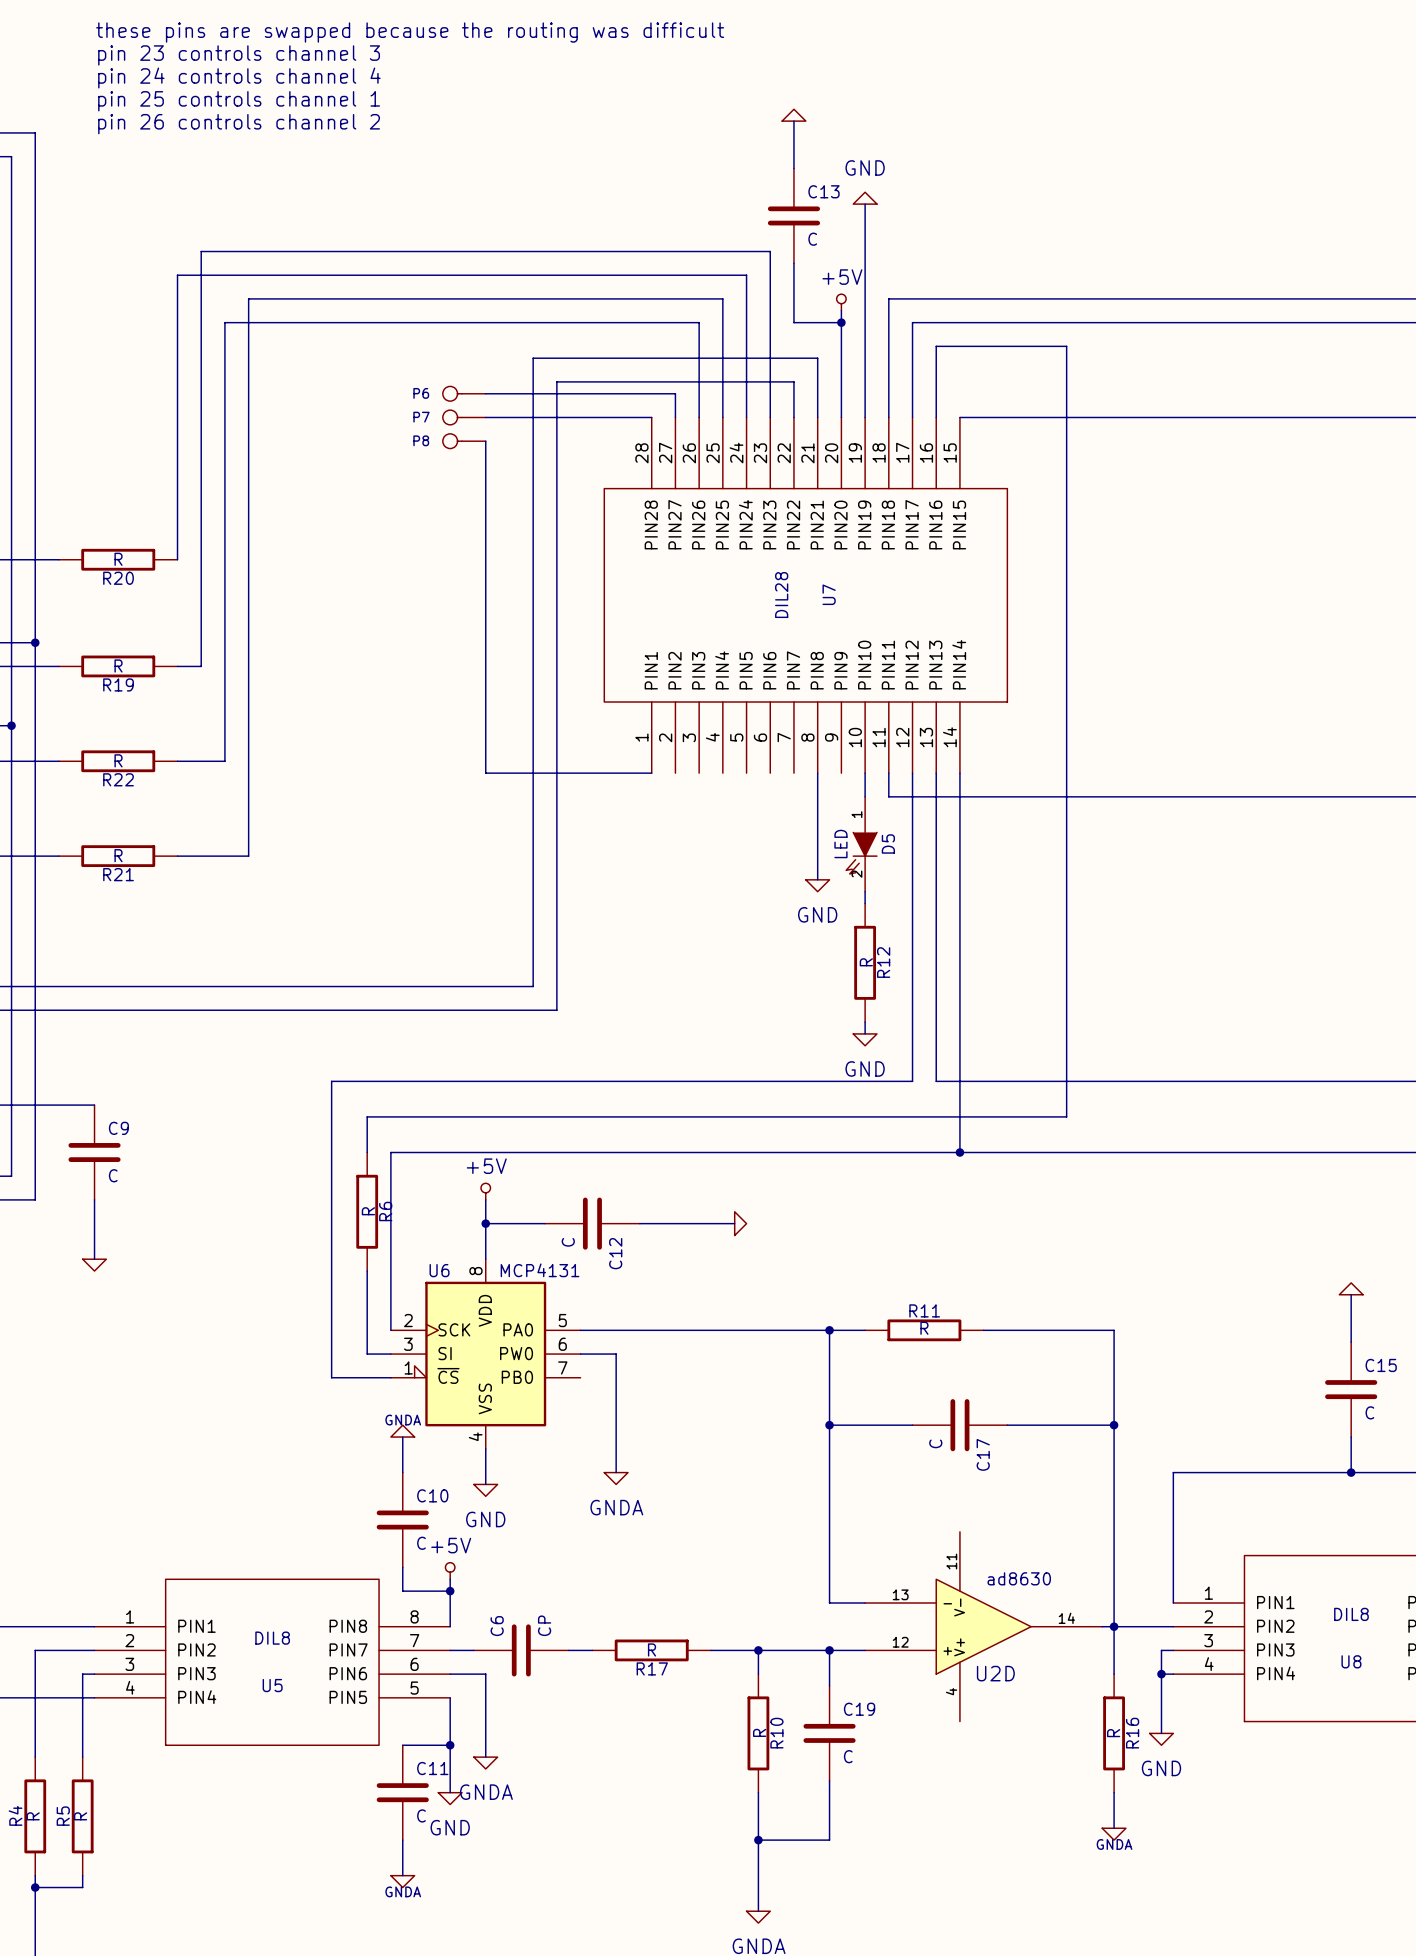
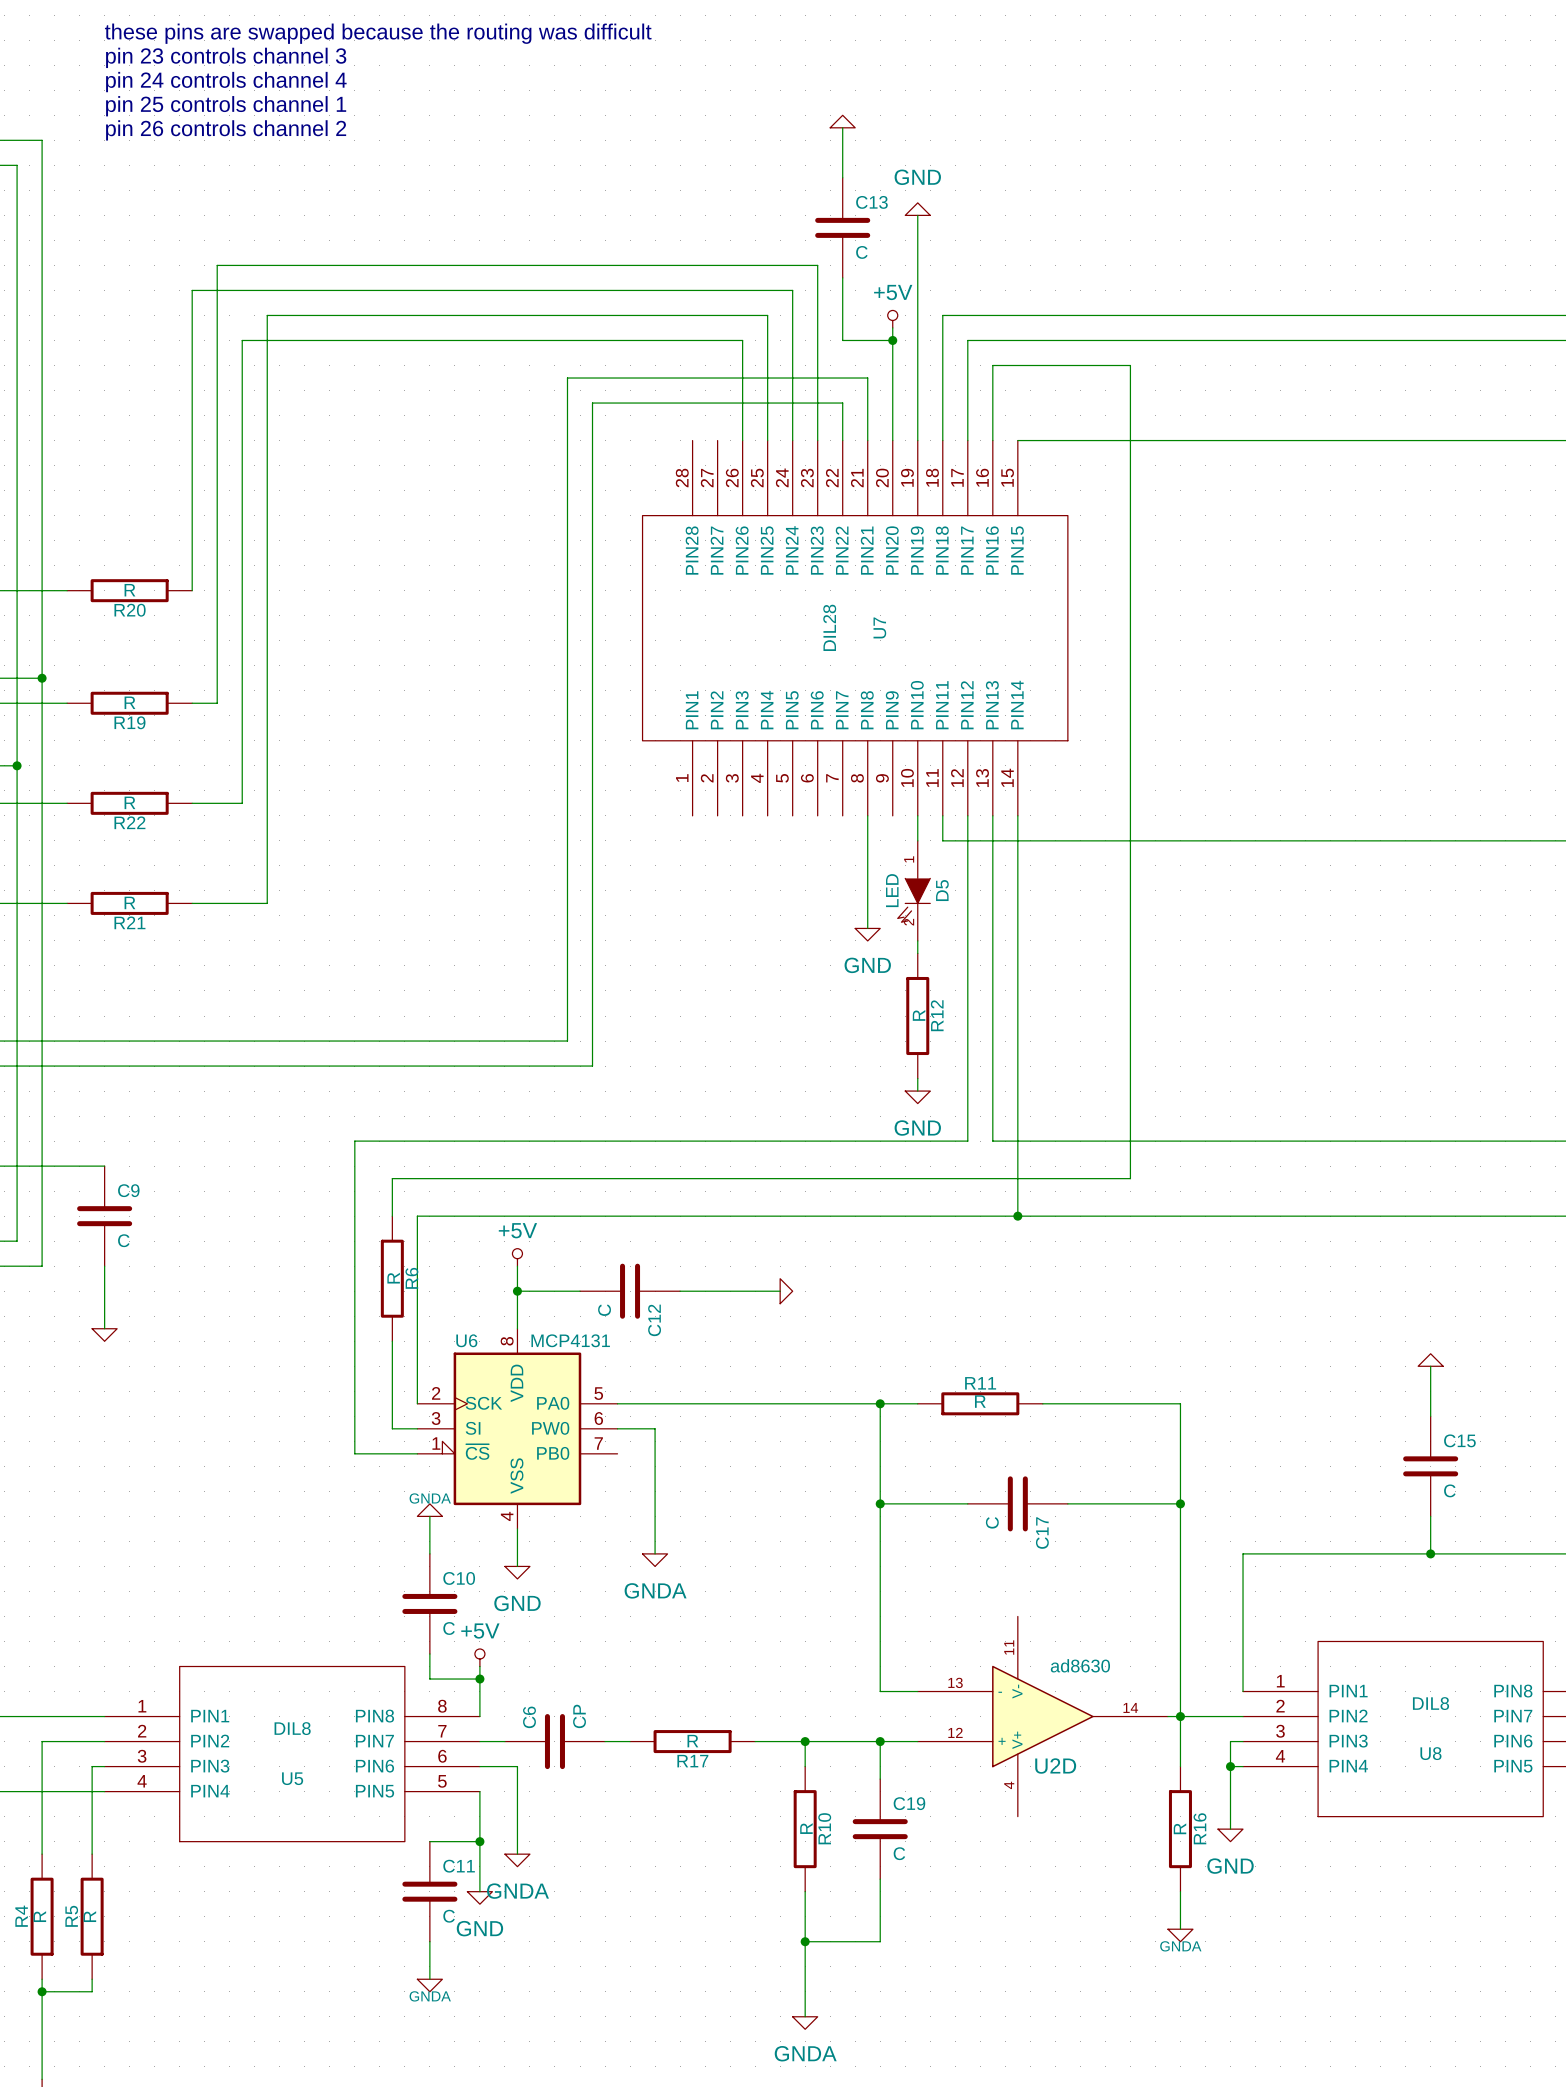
P6: (464, 393) -> none
wire: (485, 393) (675, 393) (675, 417) -> none
P7: (464, 417) -> none
wire: (485, 417) (651, 417) -> none
P8: (464, 441) -> none
wire: (485, 441) (485, 773) (651, 773) -> none

